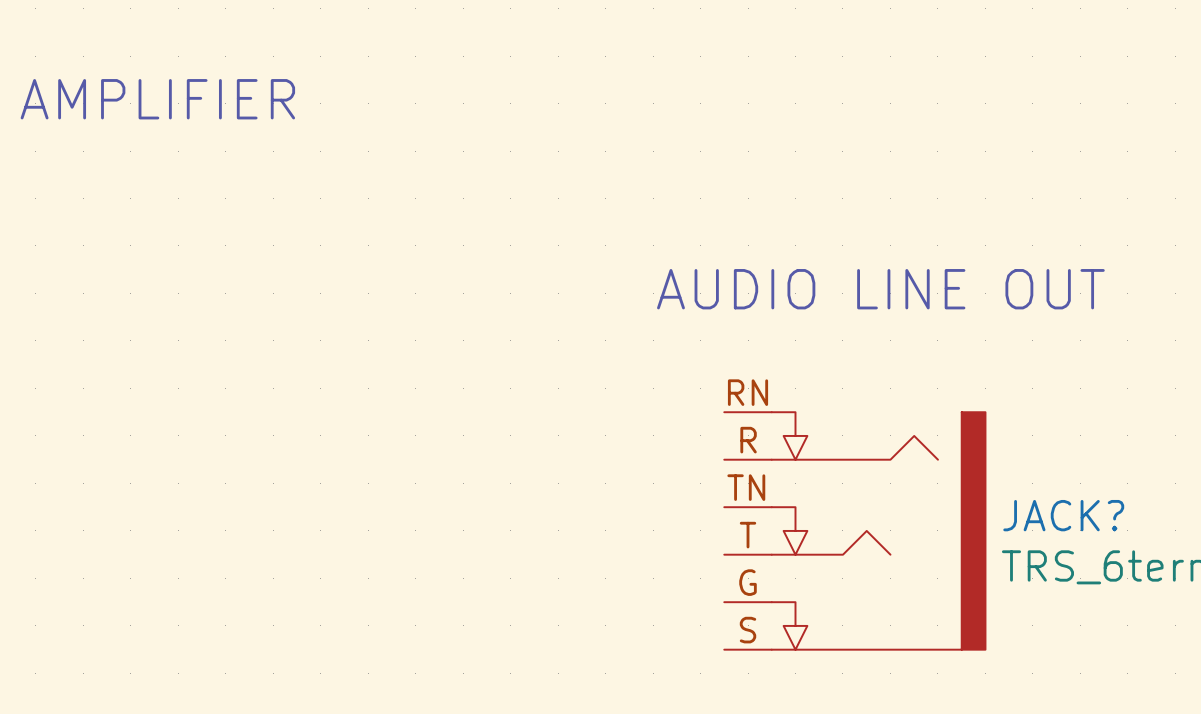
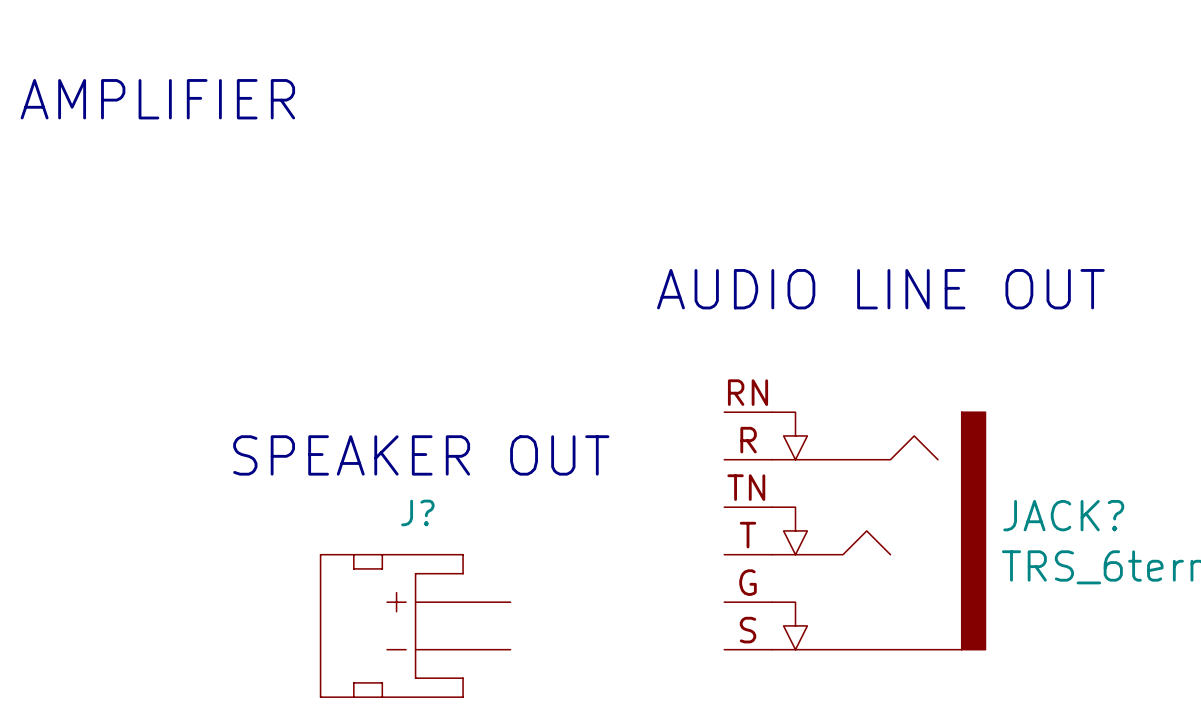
text: none -> SPEAKER OUT (421, 455)
J?: none -> (415, 625)

